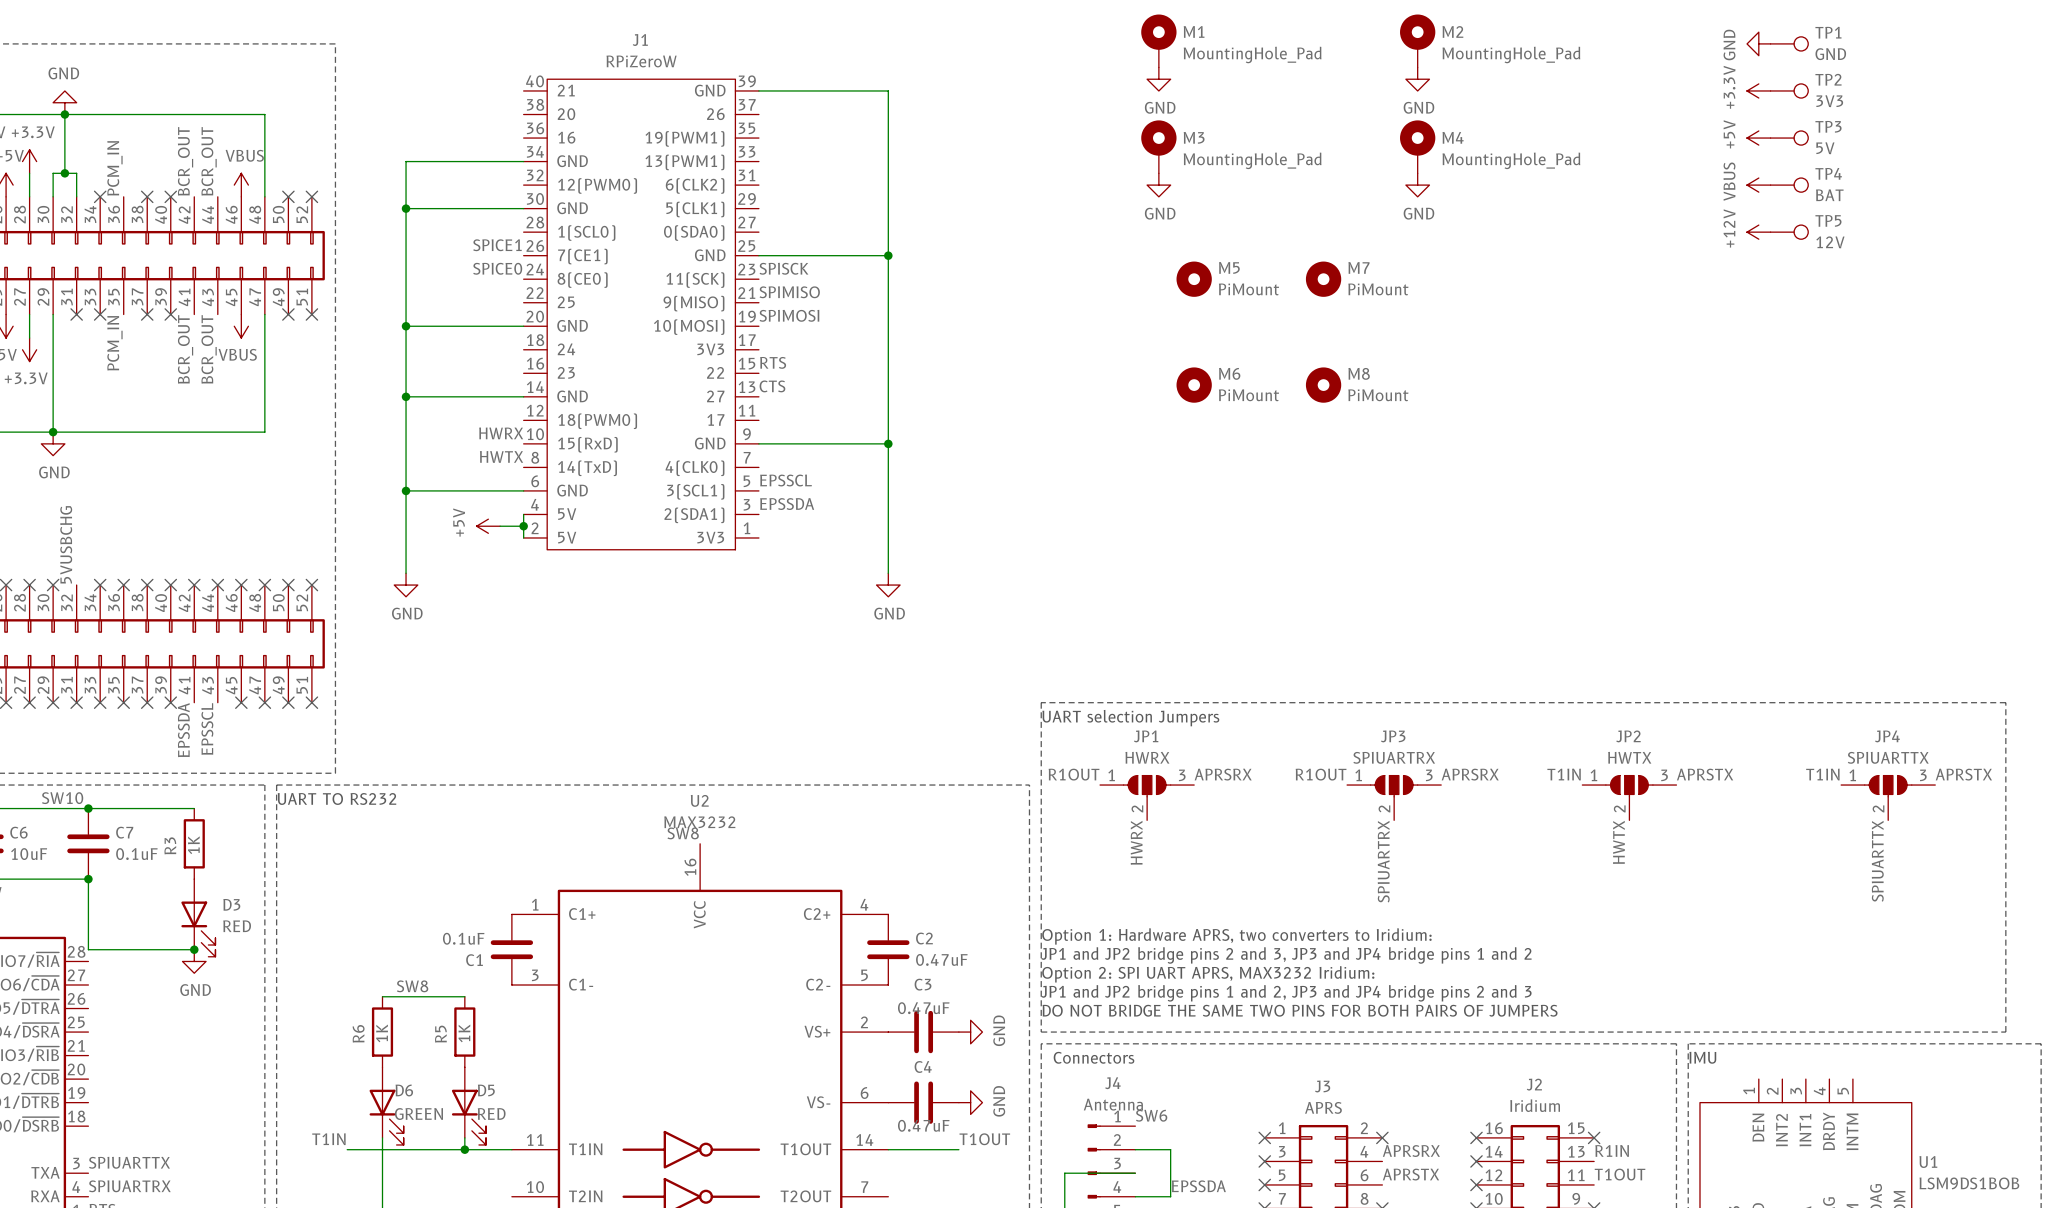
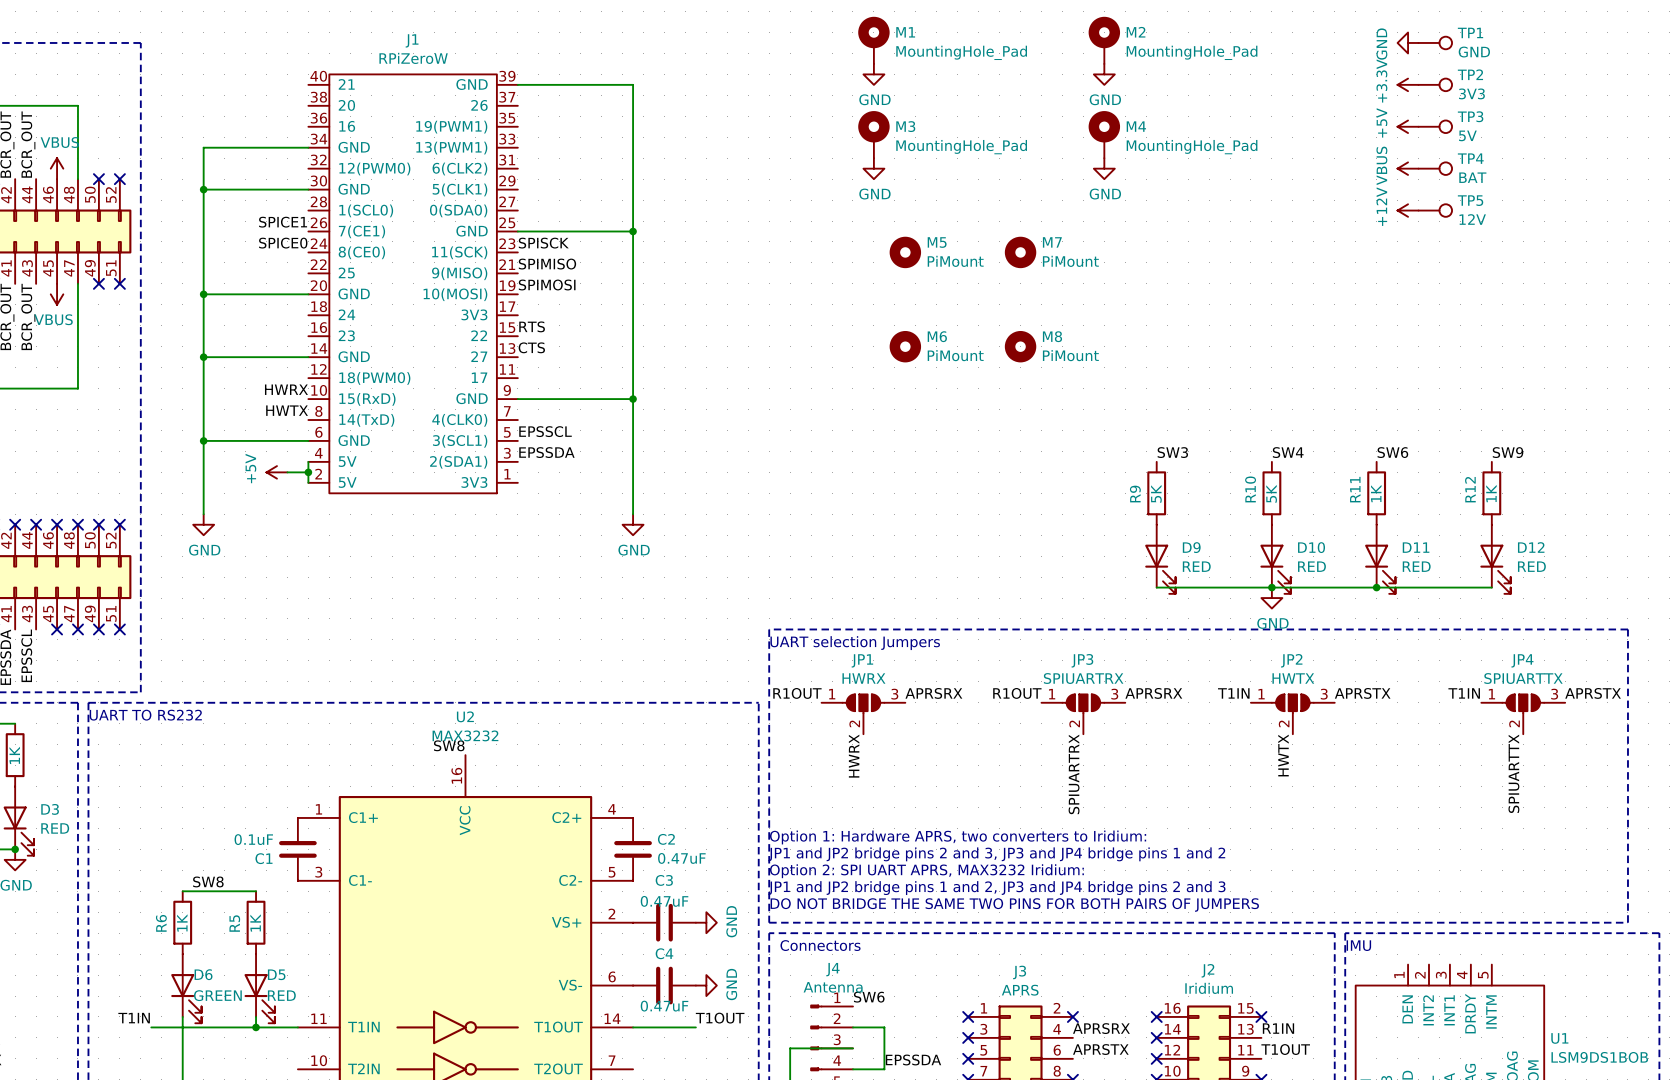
label: none -> SW3 (1172, 452)
label: none -> SW4 (1288, 452)
label: none -> SW6 (1392, 452)
label: none -> SW9 (1508, 452)
R9: none -> 5K (1156, 493)
R10: none -> 5K (1271, 493)
R11: none -> 1K (1376, 493)
R12: none -> 1K (1491, 493)
D9: none -> RED (1160, 559)
D10: none -> RED (1275, 559)
D11: none -> RED (1380, 559)
D12: none -> RED (1495, 559)
wire: none -> (1156, 587) (1491, 587)
junction: none -> (1271, 587)
junction: none -> (1376, 587)
power symbol: none -> GND (1271, 598)

